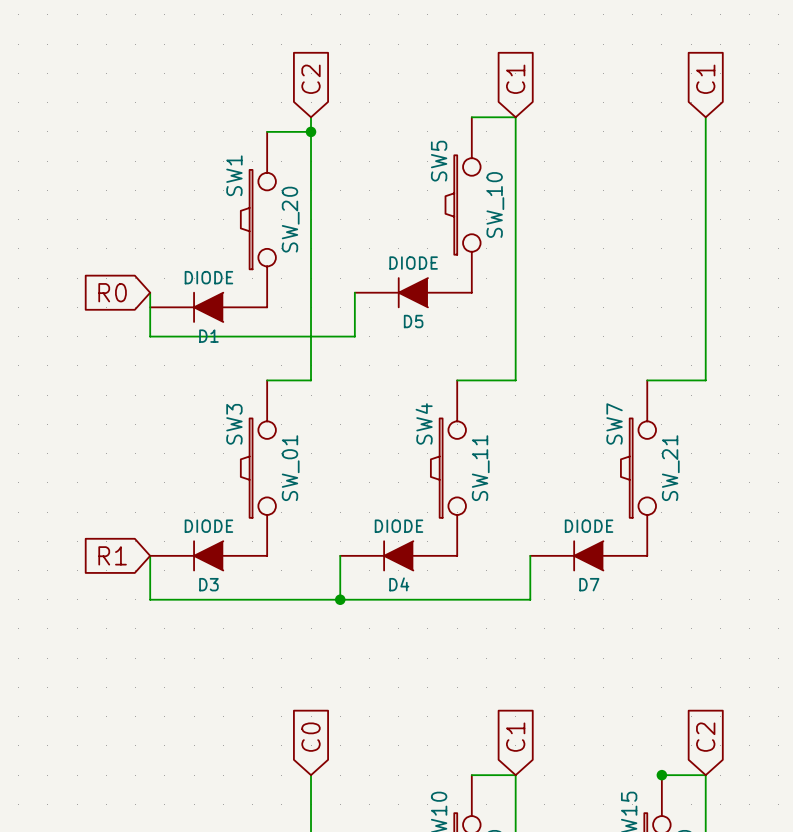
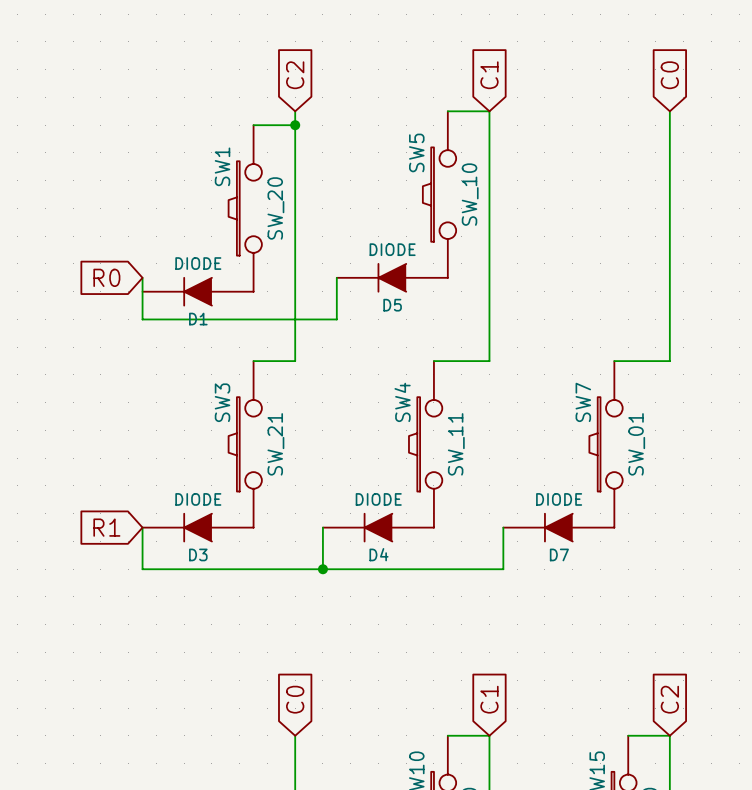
global label: C1 (705, 79) -> C0 (669, 75)
SW3 value: SW_01 (290, 468) -> SW_21 (275, 444)
SW7 value: SW_21 (670, 468) -> SW_01 (636, 444)
junction: (661, 775) -> none

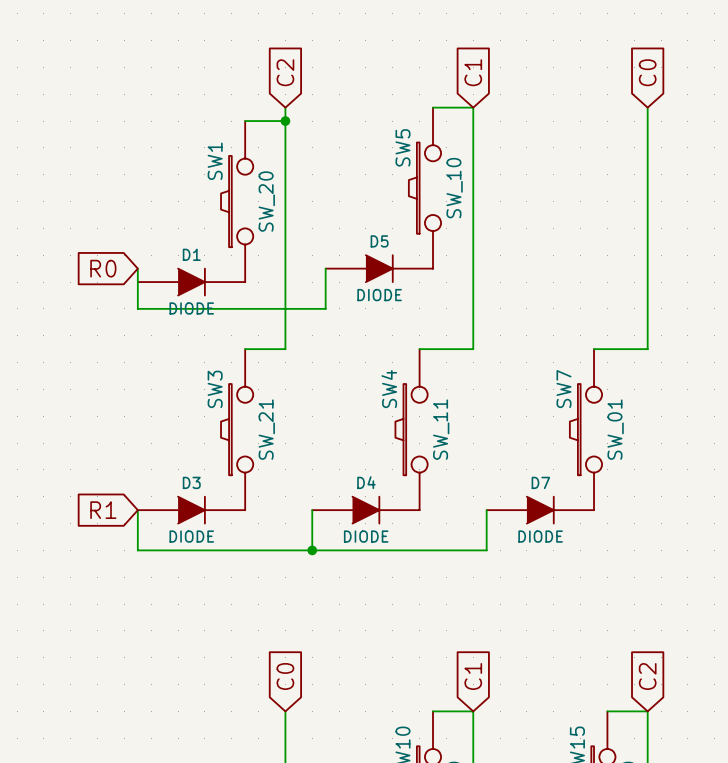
D5 rotation: 0° (391, 277) -> 180° (379, 268)
D1 rotation: 0° (197, 291) -> 180° (191, 282)
D3 rotation: 0° (197, 527) -> 180° (191, 510)
D4 rotation: 0° (378, 527) -> 180° (366, 510)
D7 rotation: 0° (558, 527) -> 180° (540, 510)

